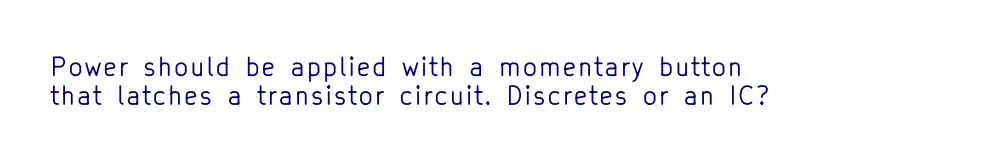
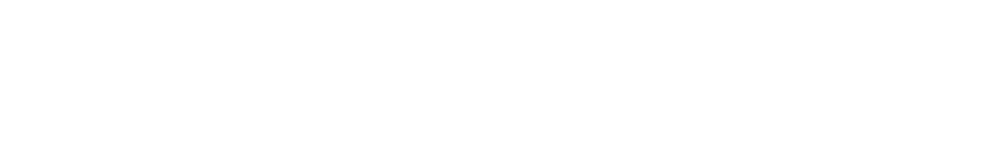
text: Power should be applied with a momentary button (396, 69) -> none
text: that latches a transistor circuit. Discretes or an IC? (409, 95) -> none

